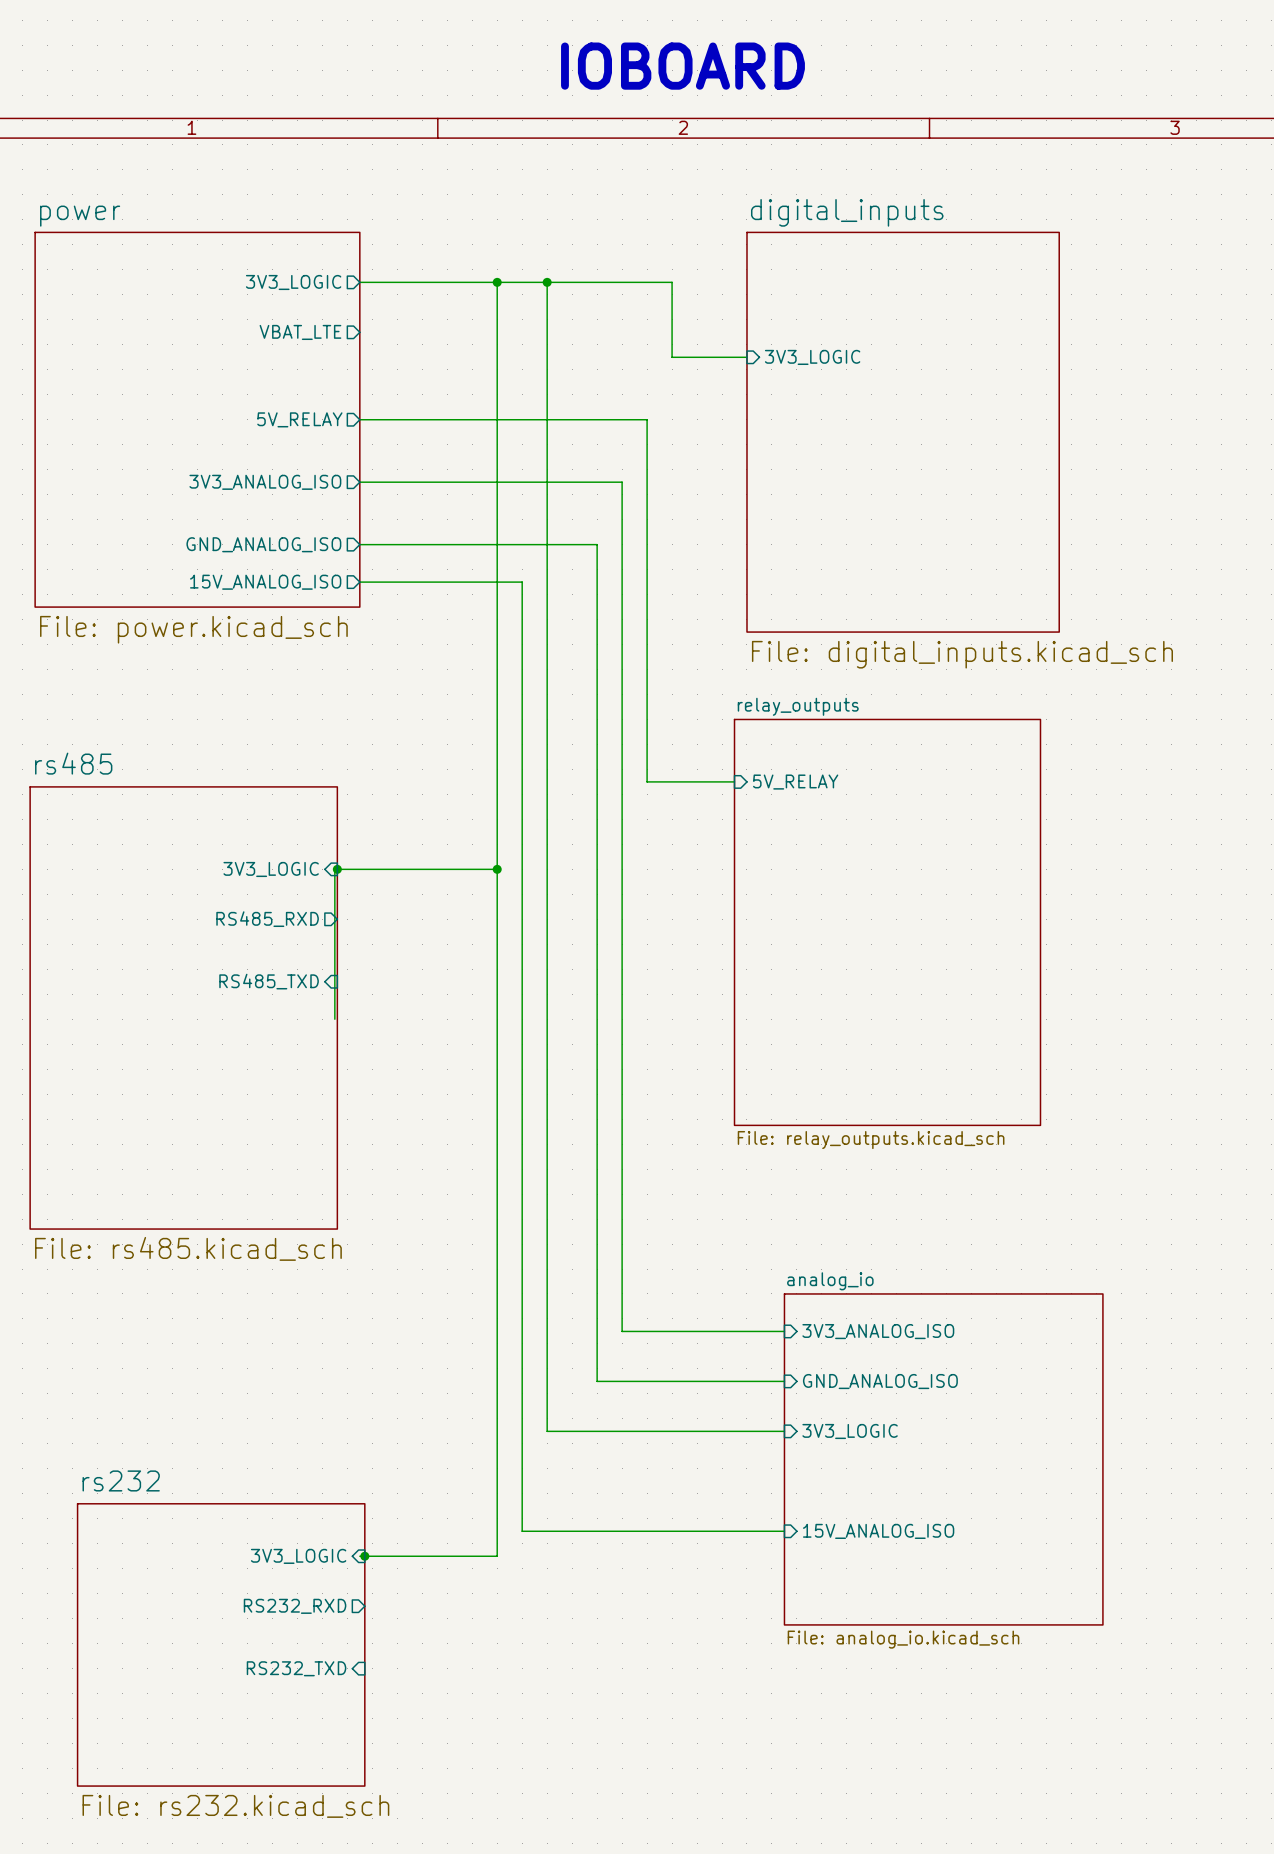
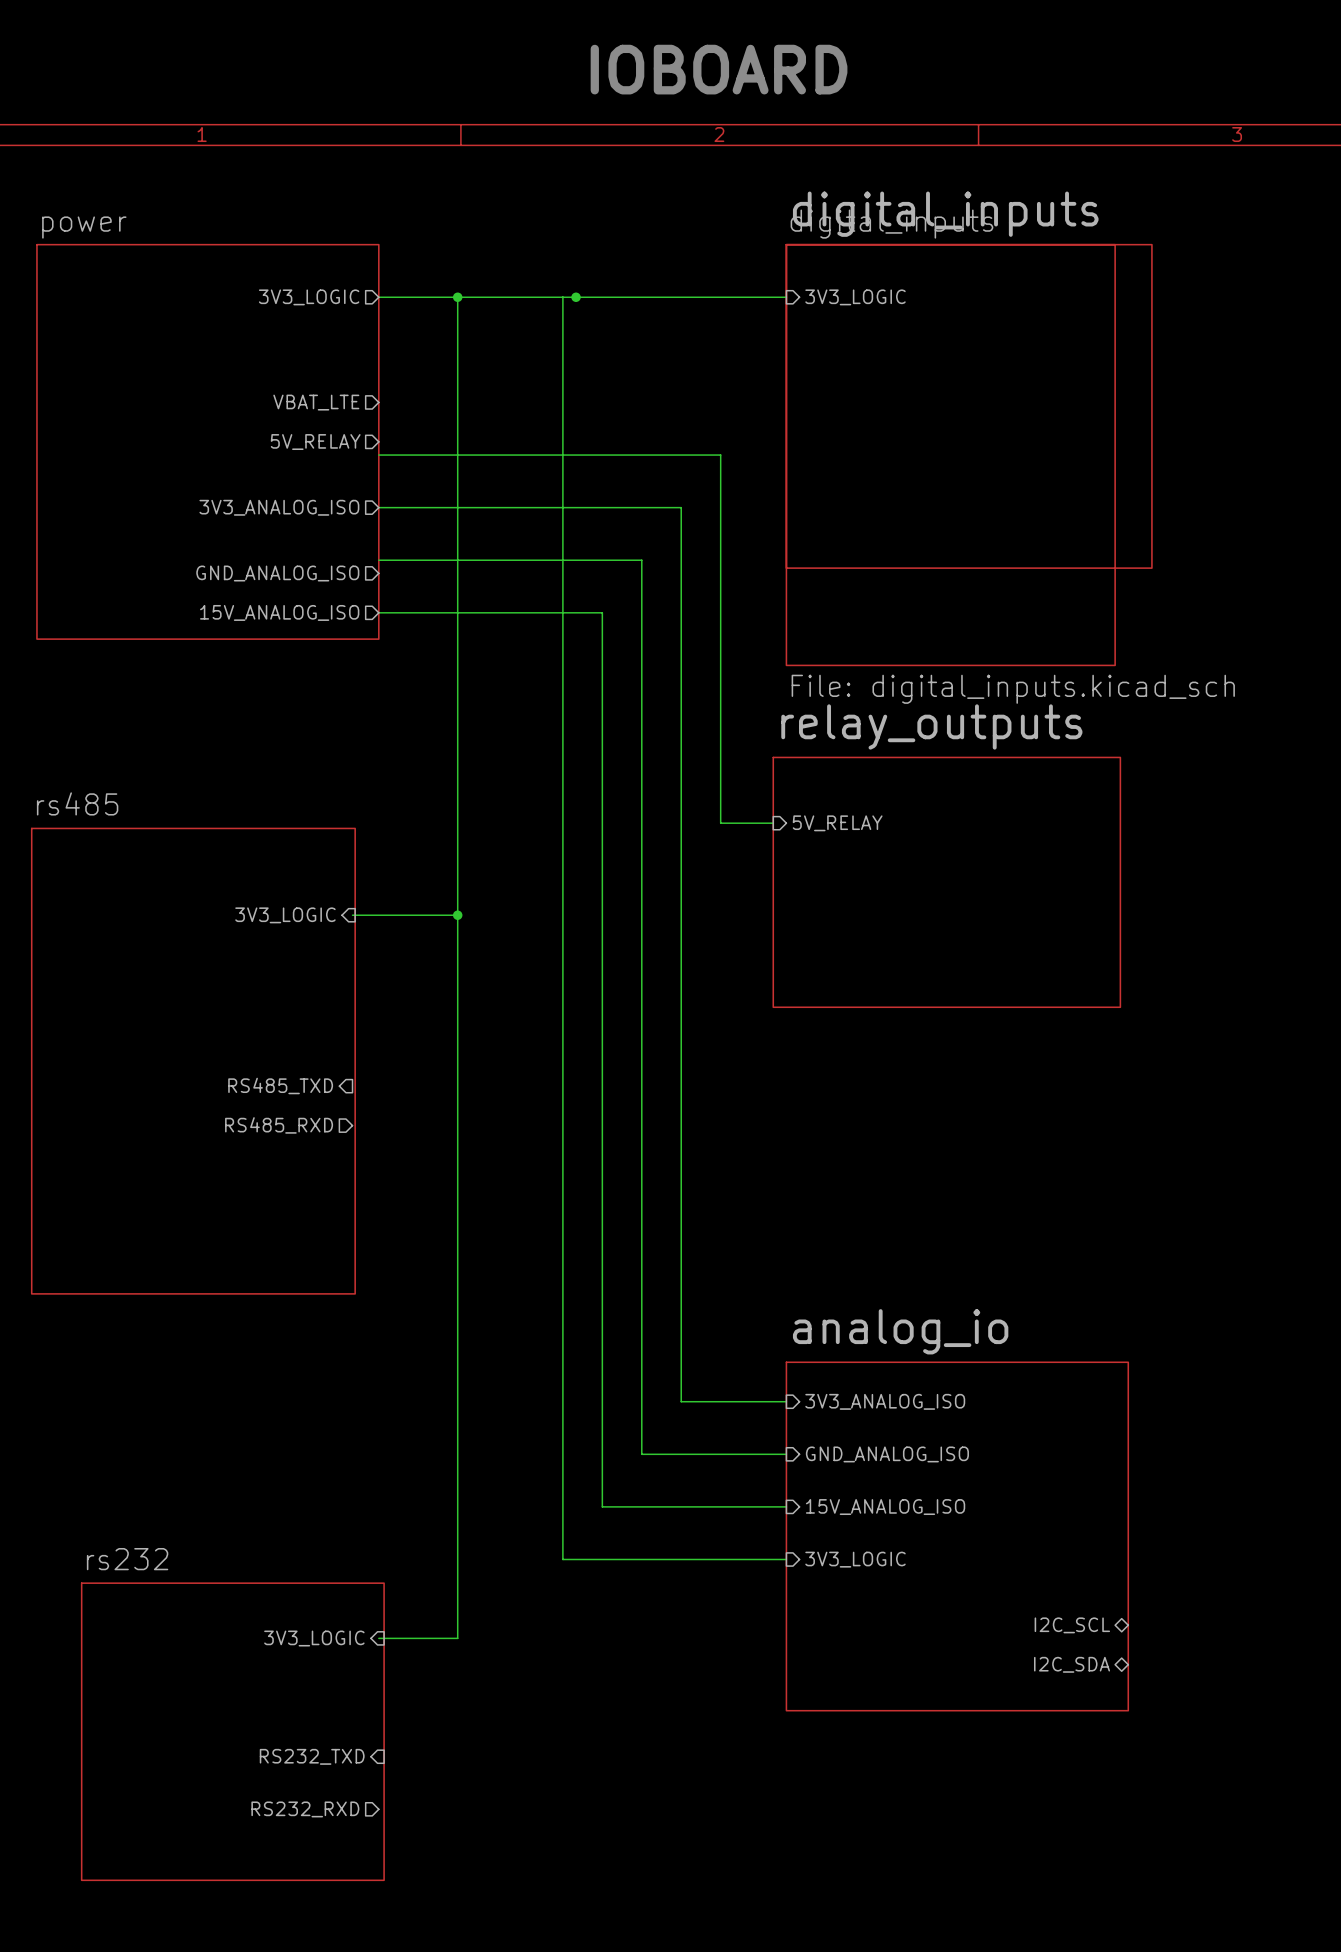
junction: none -> (457, 297)
wire: (497, 282) (497, 1556) (434, 1556) -> (457, 297) (457, 1638)
junction: (497, 282) -> none
wire: none -> (562, 297) (562, 1559) (786, 1559)
wire: (547, 282) (547, 1431) (572, 1431) -> none
wire: (672, 282) (672, 357) (746, 357) -> (707, 297) (786, 297)
sheet pin position: VBAT_LTE (300, 332) -> VBAT_LTE (316, 402)
sheet pin position: 3V3_LOGIC (812, 357) -> 3V3_LOGIC (855, 297)
sheet digital_inputs: none -> (969, 406)
wire: (359, 419) (647, 419) (647, 482) -> (654, 507) (681, 507)
wire: (622, 482) (622, 1331) (647, 1331) -> (681, 823) (681, 1401)
wire: (359, 544) (597, 544) (597, 1381) (609, 1381) -> (378, 560) (641, 560) (641, 1454)
wire: (522, 582) (522, 1531) (784, 1531) -> (549, 612) (602, 612) (602, 1506)
sheet power value: File: power.kicad_sch (193, 629) -> none
wire: (647, 781) (684, 781) -> (378, 455) (720, 455) (720, 823)
sheet relay_outputs: none -> (946, 882)
wire: (334, 869) (334, 1019) -> none
junction: (337, 869) -> none
wire: (434, 869) (497, 869) -> none
junction: none -> (457, 915)
junction: (497, 869) -> none
sheet pin position: RS485_RXD (267, 919) -> RS485_RXD (279, 1125)
sheet relay_outputs: File: relay_outputs.kicad_sch (887, 922) -> none
sheet pin position: RS485_TXD (269, 981) -> RS485_TXD (280, 1085)
sheet rs485 value: File: rs485.kicad_sch (188, 1248) -> none
wire: (746, 1331) (784, 1331) -> none
sheet pin position: 3V3_ANALOG_ISO (878, 1331) -> 3V3_ANALOG_ISO (885, 1401)
wire: (746, 1381) (784, 1381) -> none
sheet pin position: GND_ANALOG_ISO (880, 1381) -> GND_ANALOG_ISO (887, 1454)
wire: (746, 1431) (784, 1431) -> none
sheet pin position: 3V3_LOGIC (850, 1431) -> 3V3_LOGIC (855, 1559)
sheet analog_io: none -> (957, 1536)
sheet analog_io: File: analog_io.kicad_sch (943, 1459) -> none
sheet pin position: 15V_ANALOG_ISO (878, 1531) -> 15V_ANALOG_ISO (885, 1507)
sheet pin: none -> I2C_SCL (1072, 1625)
junction: (364, 1556) -> none
sheet pin: none -> I2C_SDA (1072, 1664)
sheet pin position: RS232_RXD (295, 1606) -> RS232_RXD (305, 1809)
sheet rs232 value: File: rs232.kicad_sch (235, 1806) -> none

